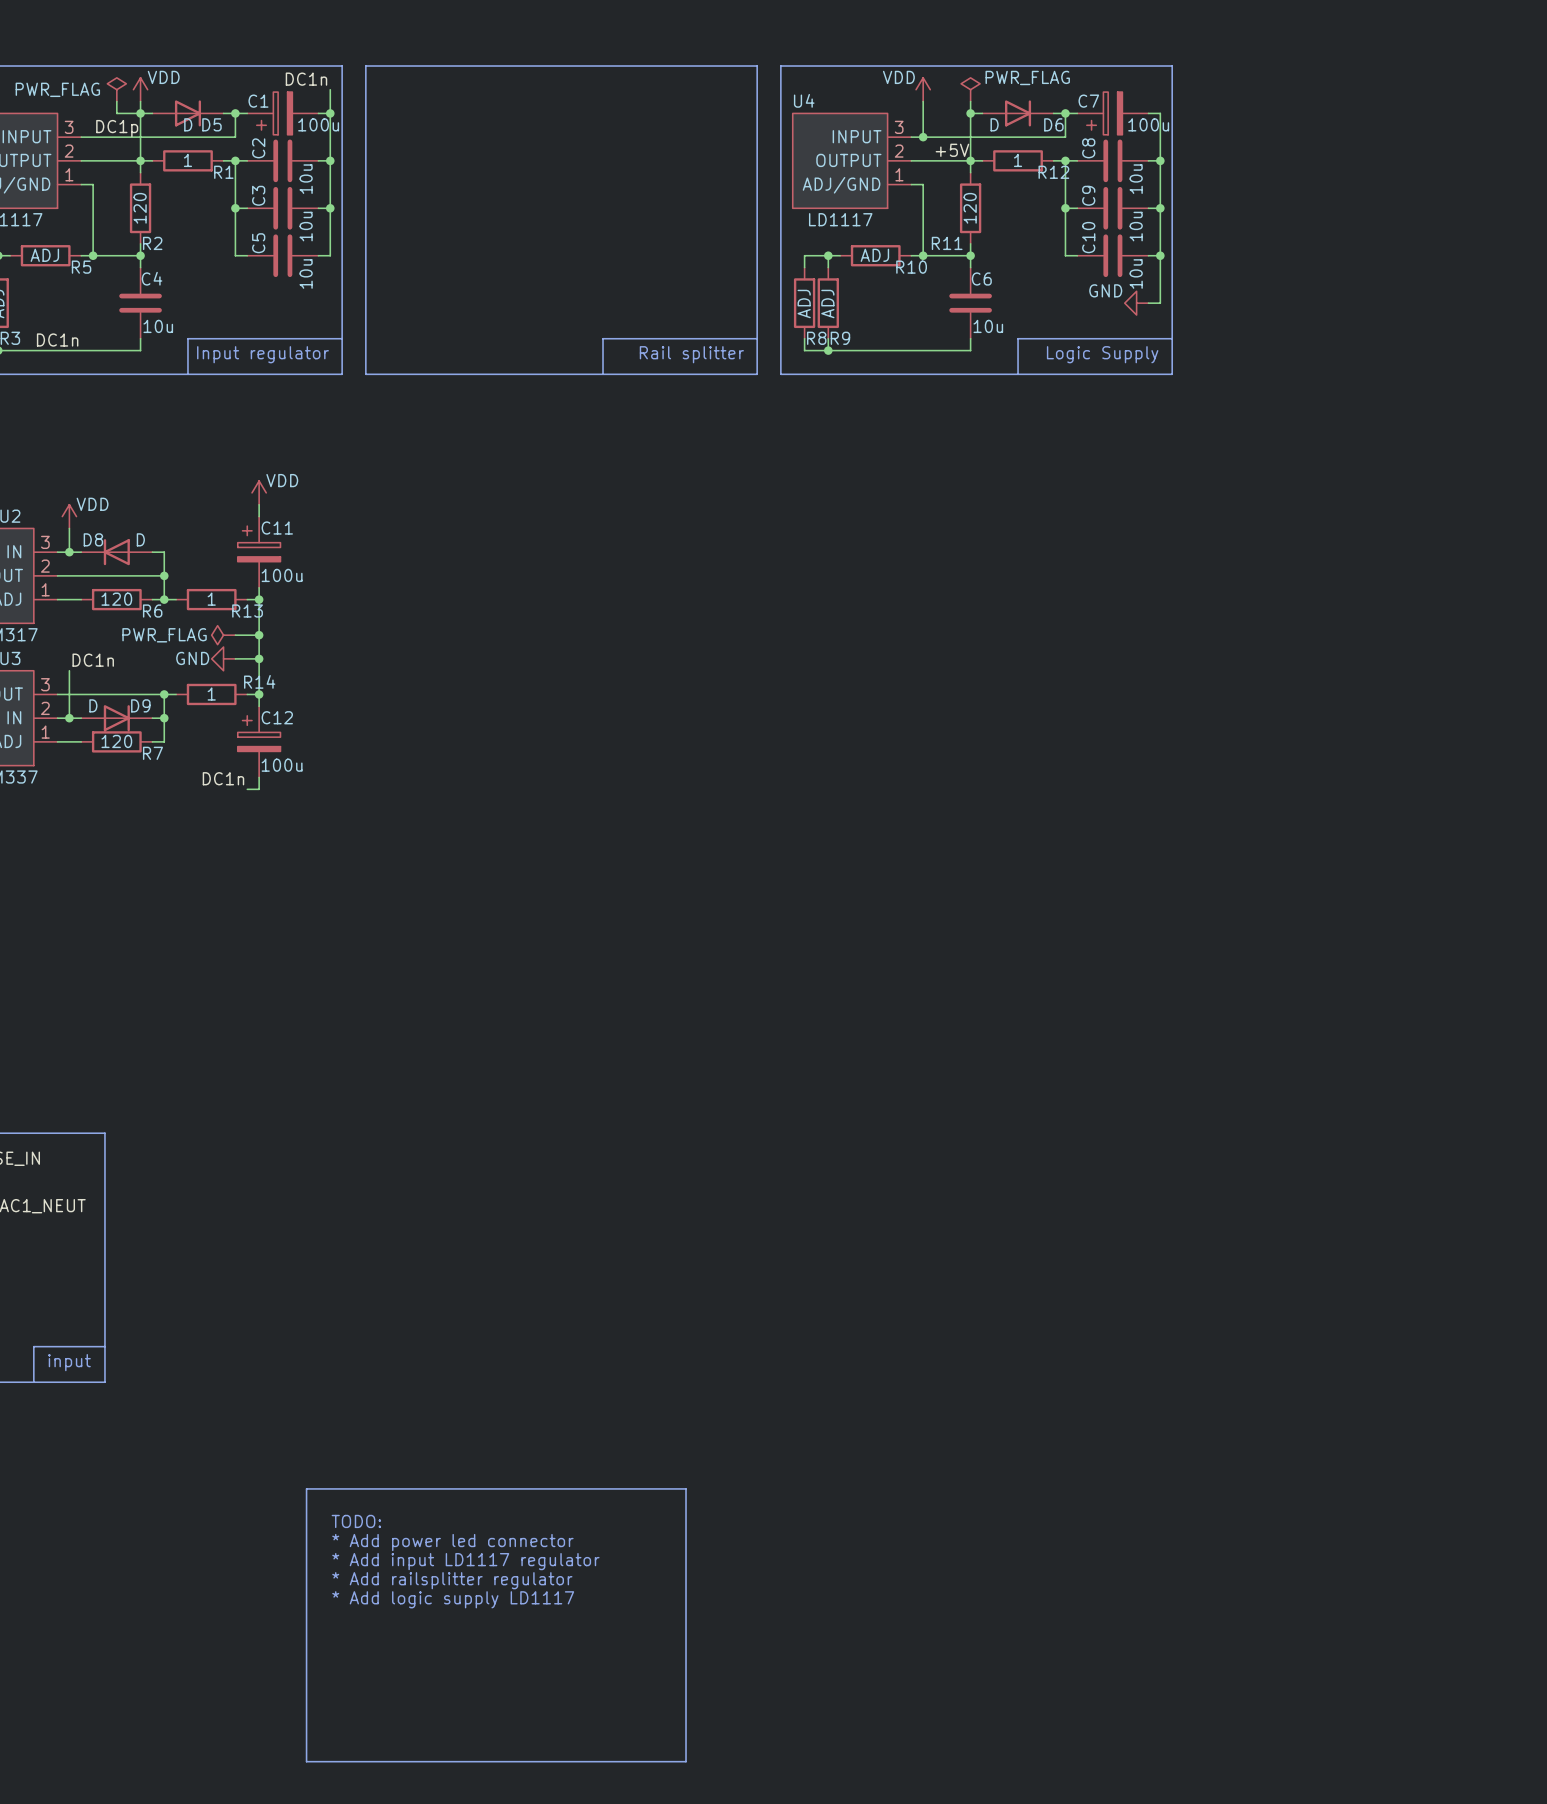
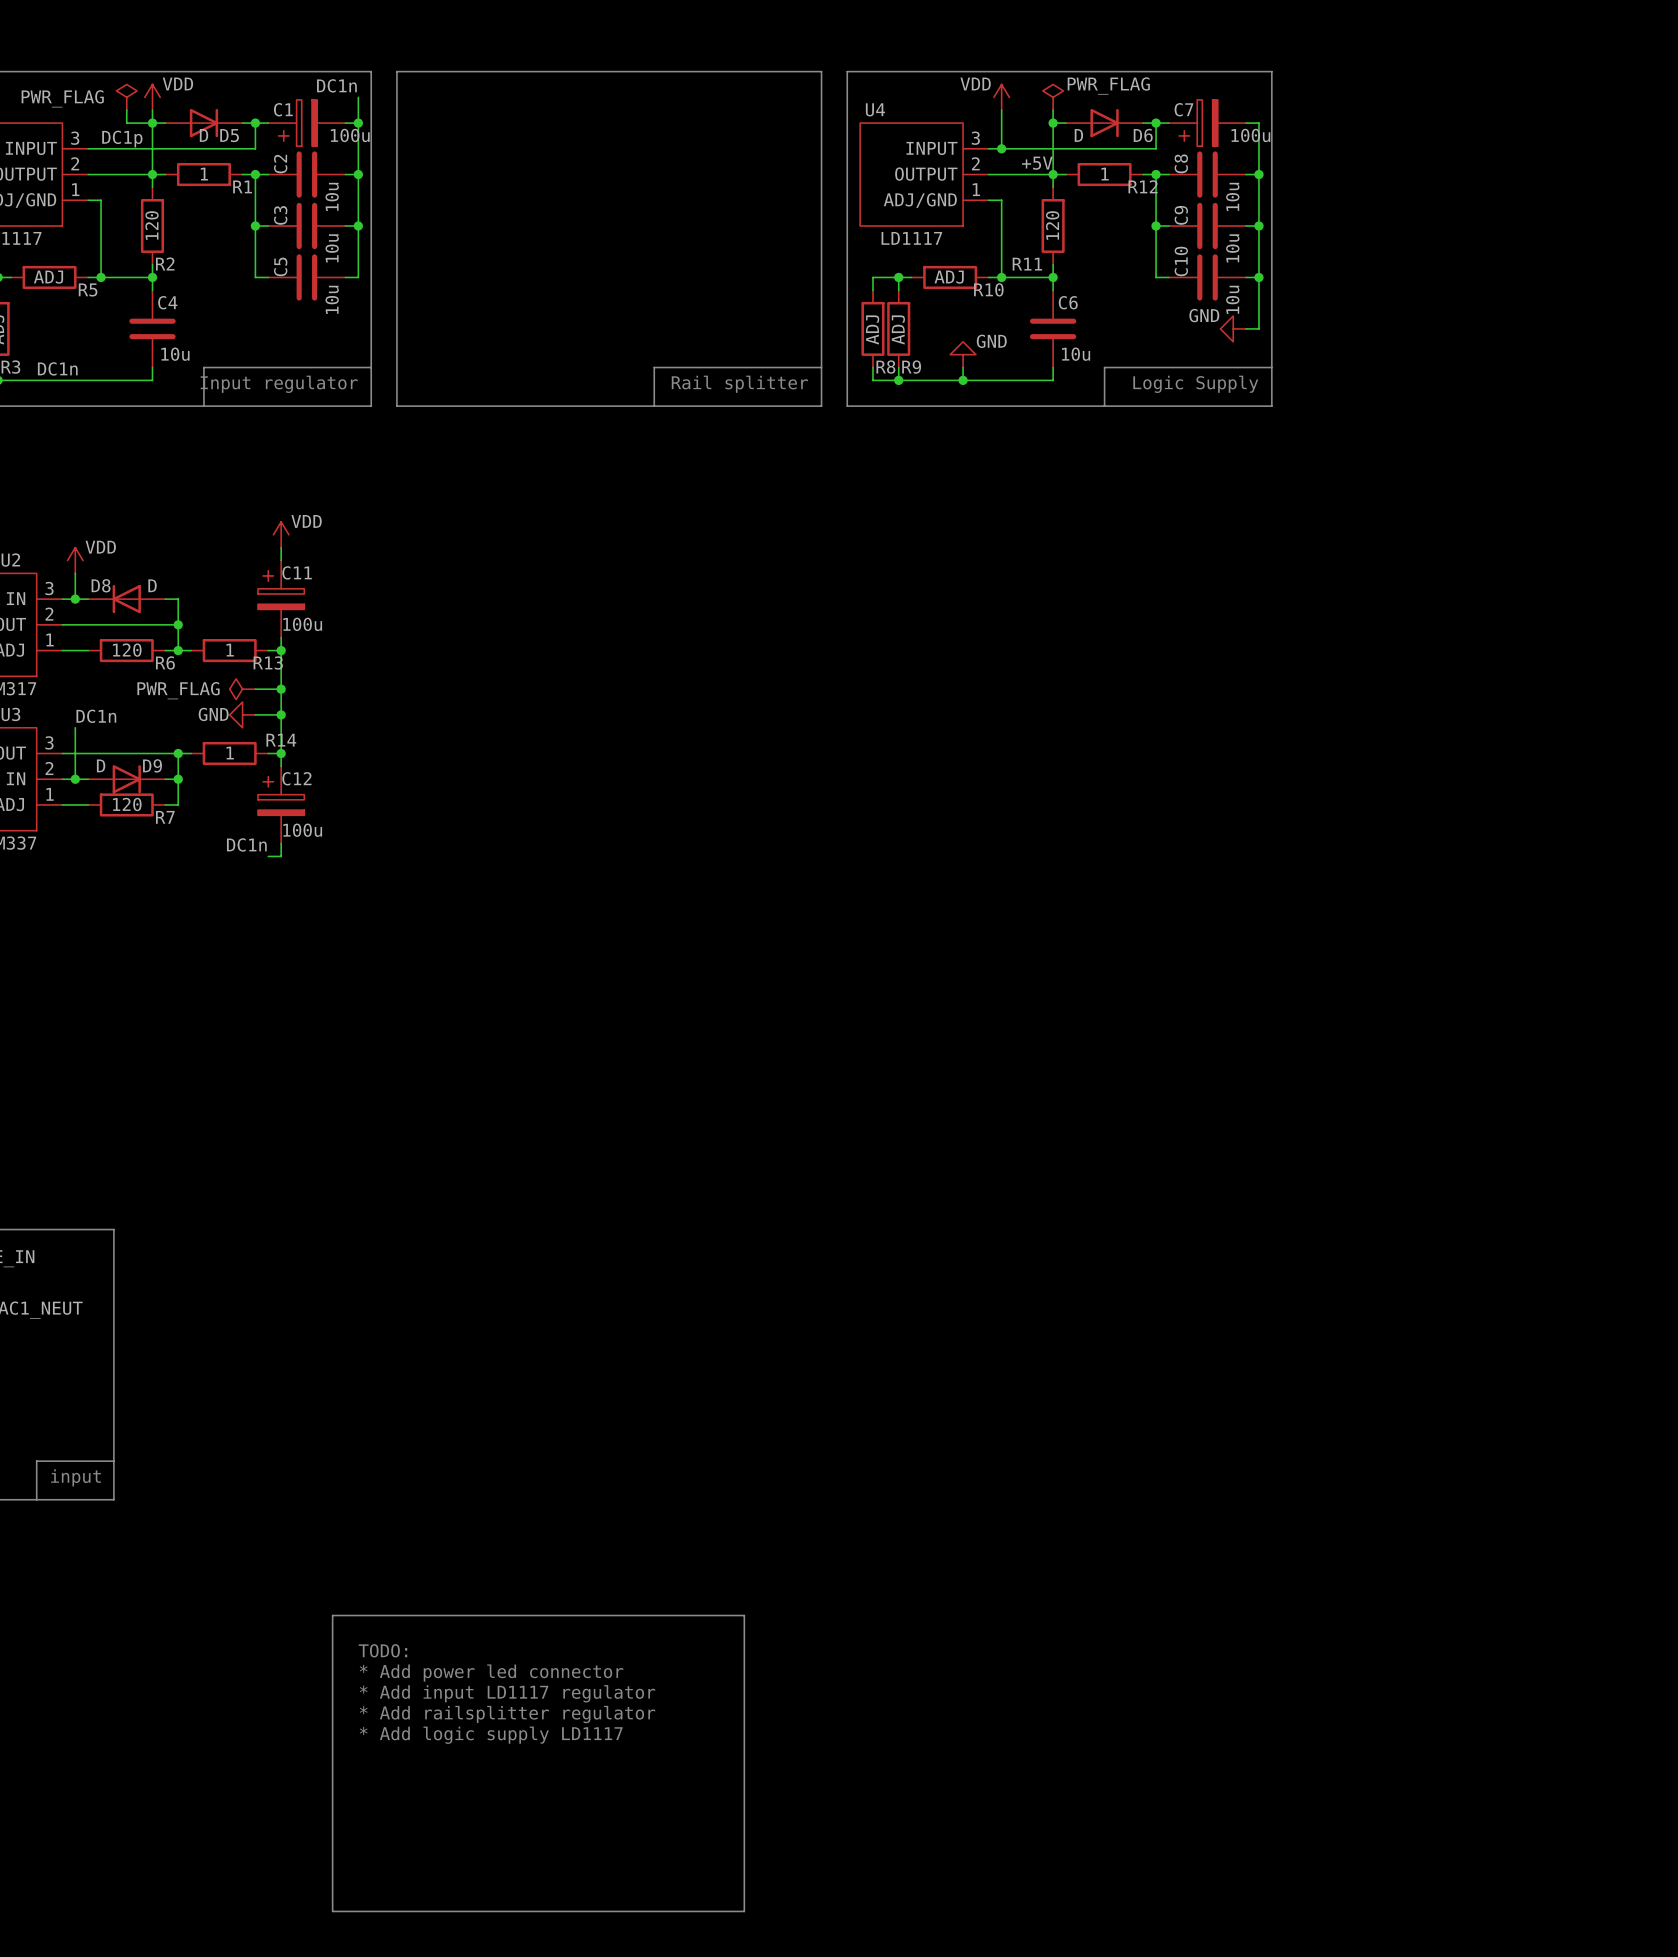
power symbol: none -> GND (963, 354)
wire: none -> (963, 367) (963, 380)
junction: none -> (963, 380)

